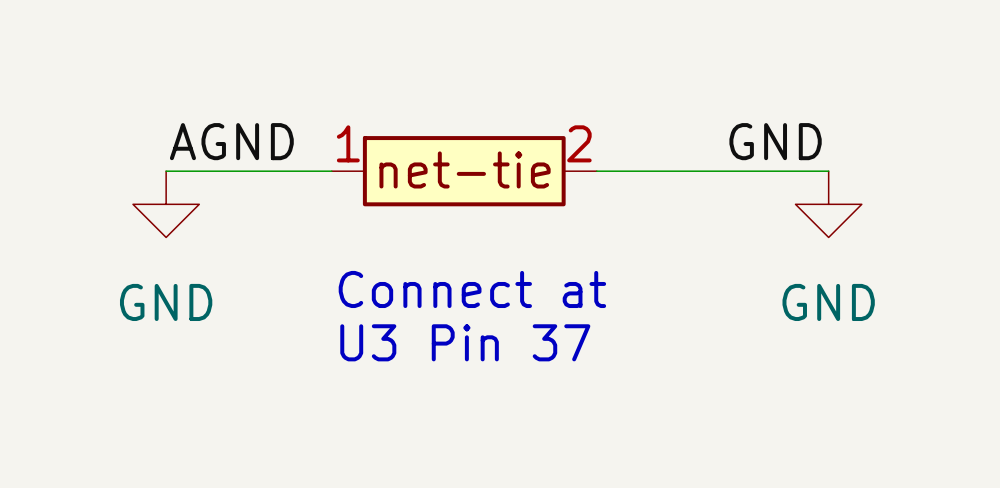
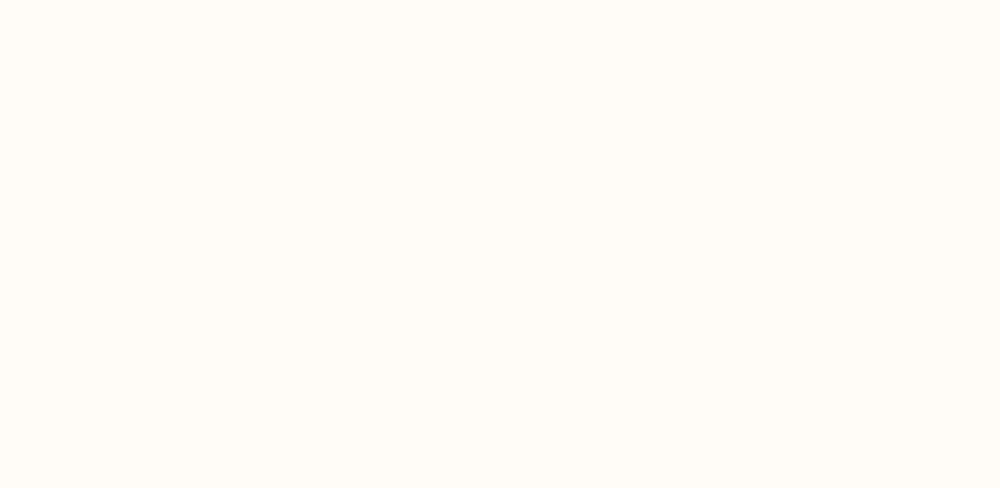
label: AGND (231, 141) -> none
label: GND (775, 141) -> none
wire: (166, 171) (331, 171) -> none
part: (464, 171) -> none
wire: (596, 171) (828, 171) -> none
power symbol: GND (166, 204) -> none
power symbol: GND (828, 204) -> none
text: Connect at (472, 289) -> none
text: U3 Pin 37 (465, 342) -> none

